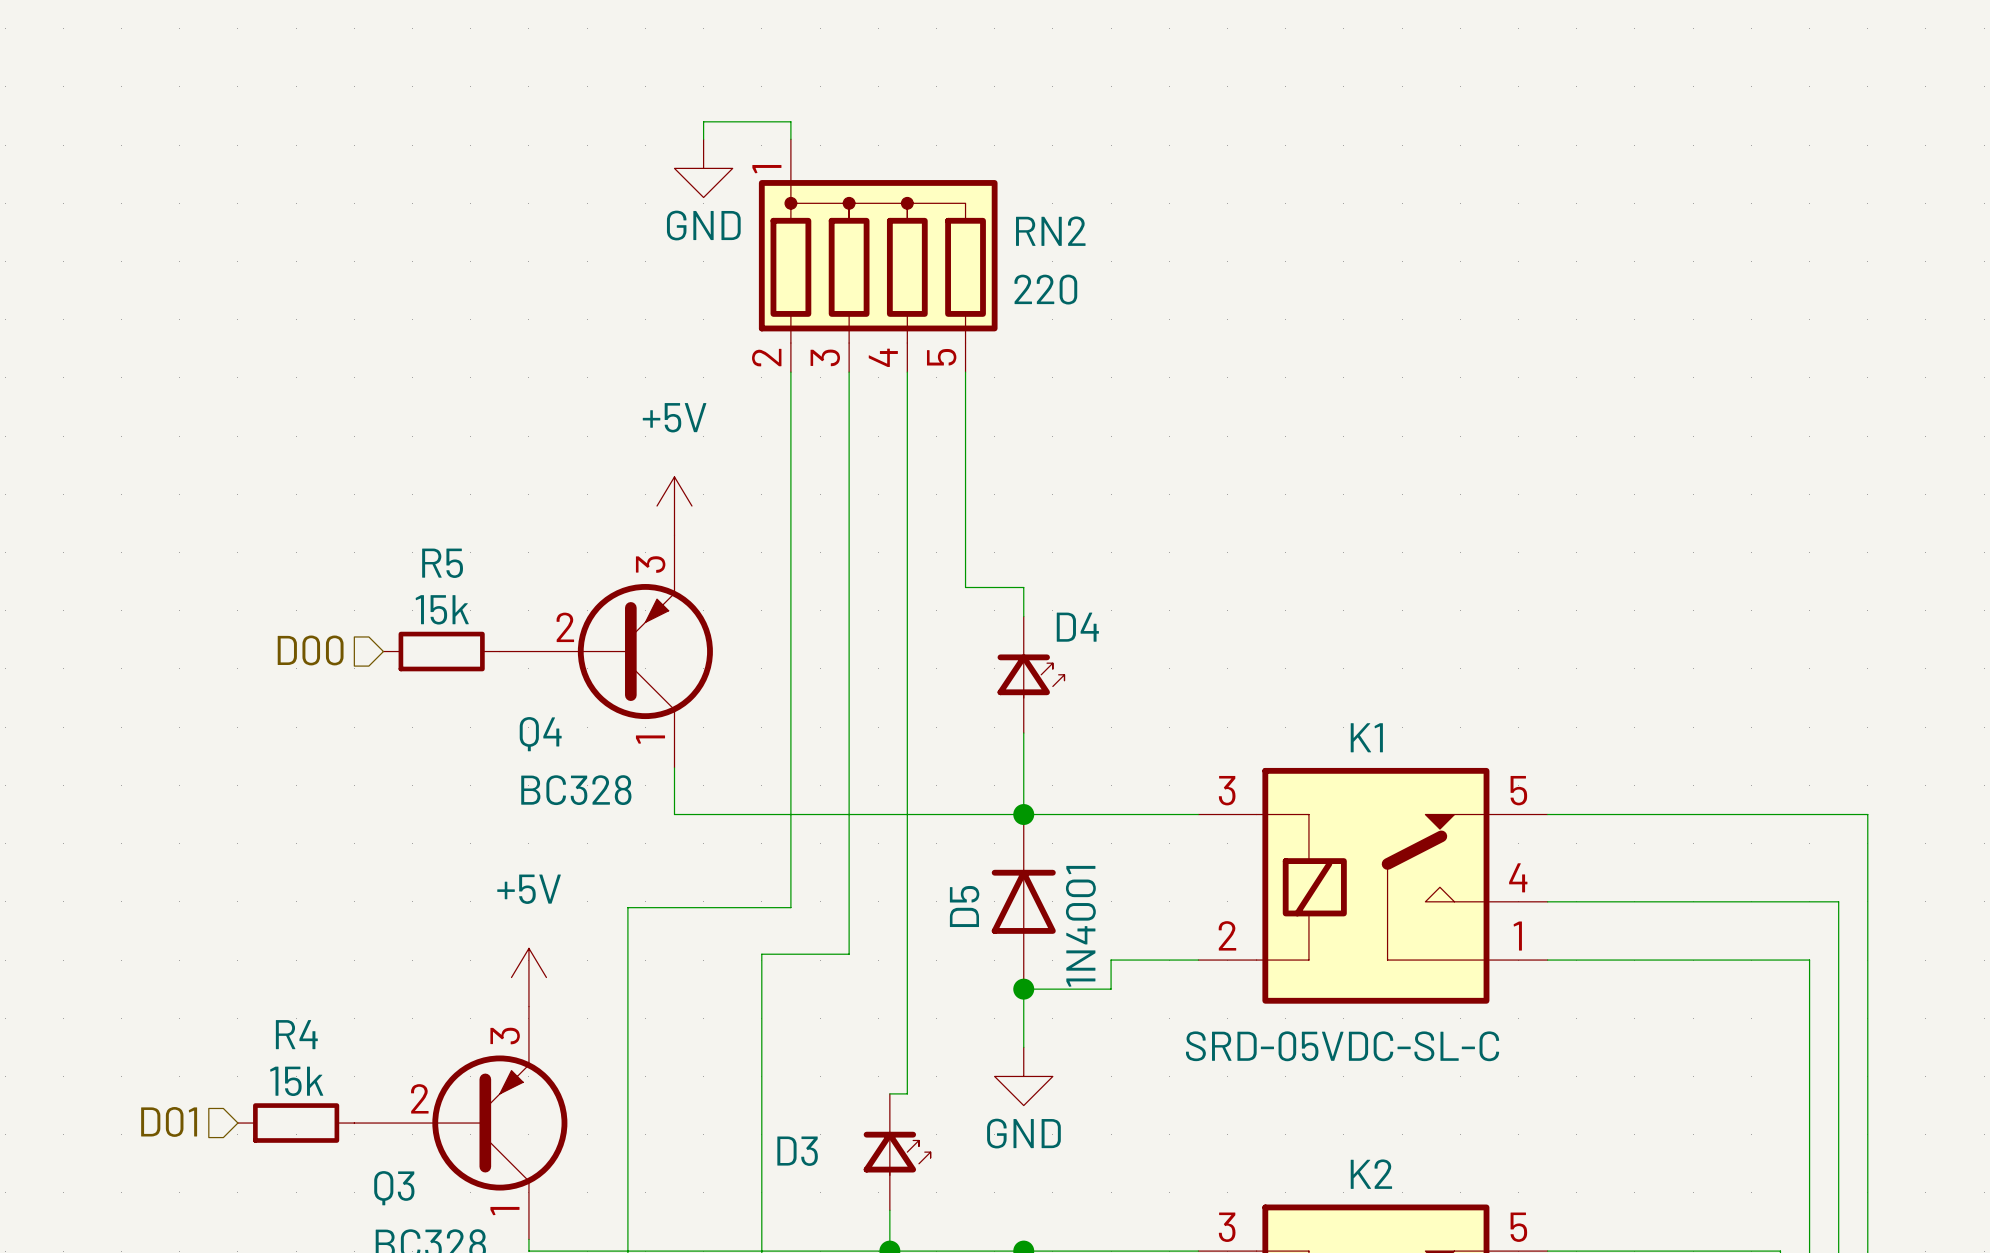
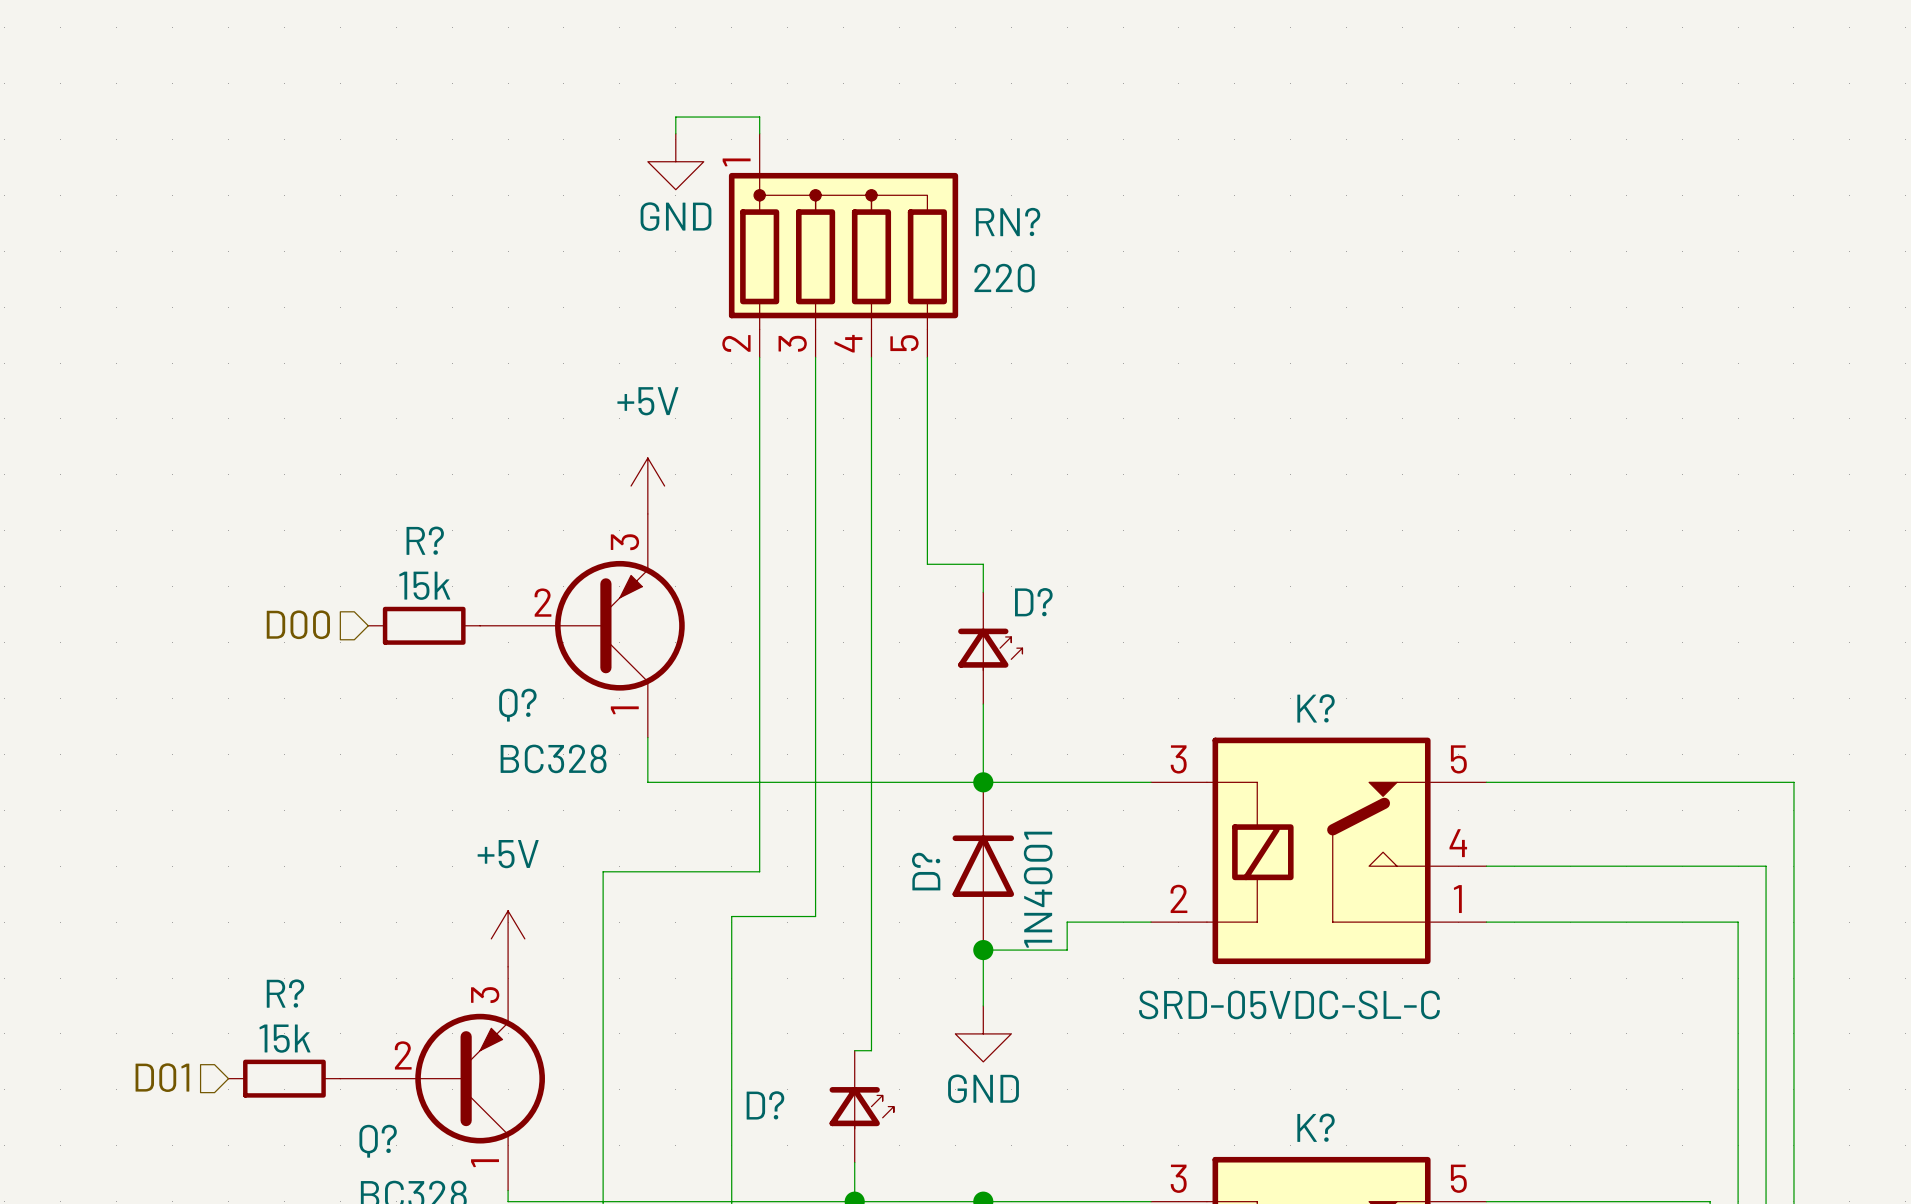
RN2 name: RN2 (1050, 231) -> RN? (1008, 222)
R5 name: R5 (442, 563) -> R? (425, 540)
D4 name: D4 (1077, 627) -> D? (1033, 602)
Q4 name: Q4 (540, 734) -> Q? (517, 705)
K1 name: K1 (1366, 737) -> K? (1316, 708)
D5 name: D5 (964, 906) -> D? (926, 871)
R4 name: R4 (296, 1034) -> R? (285, 993)
D3 name: D3 (797, 1151) -> D? (765, 1105)
K2 name: K2 (1371, 1174) -> K? (1316, 1127)
Q3 name: Q3 (394, 1188) -> Q? (378, 1141)

